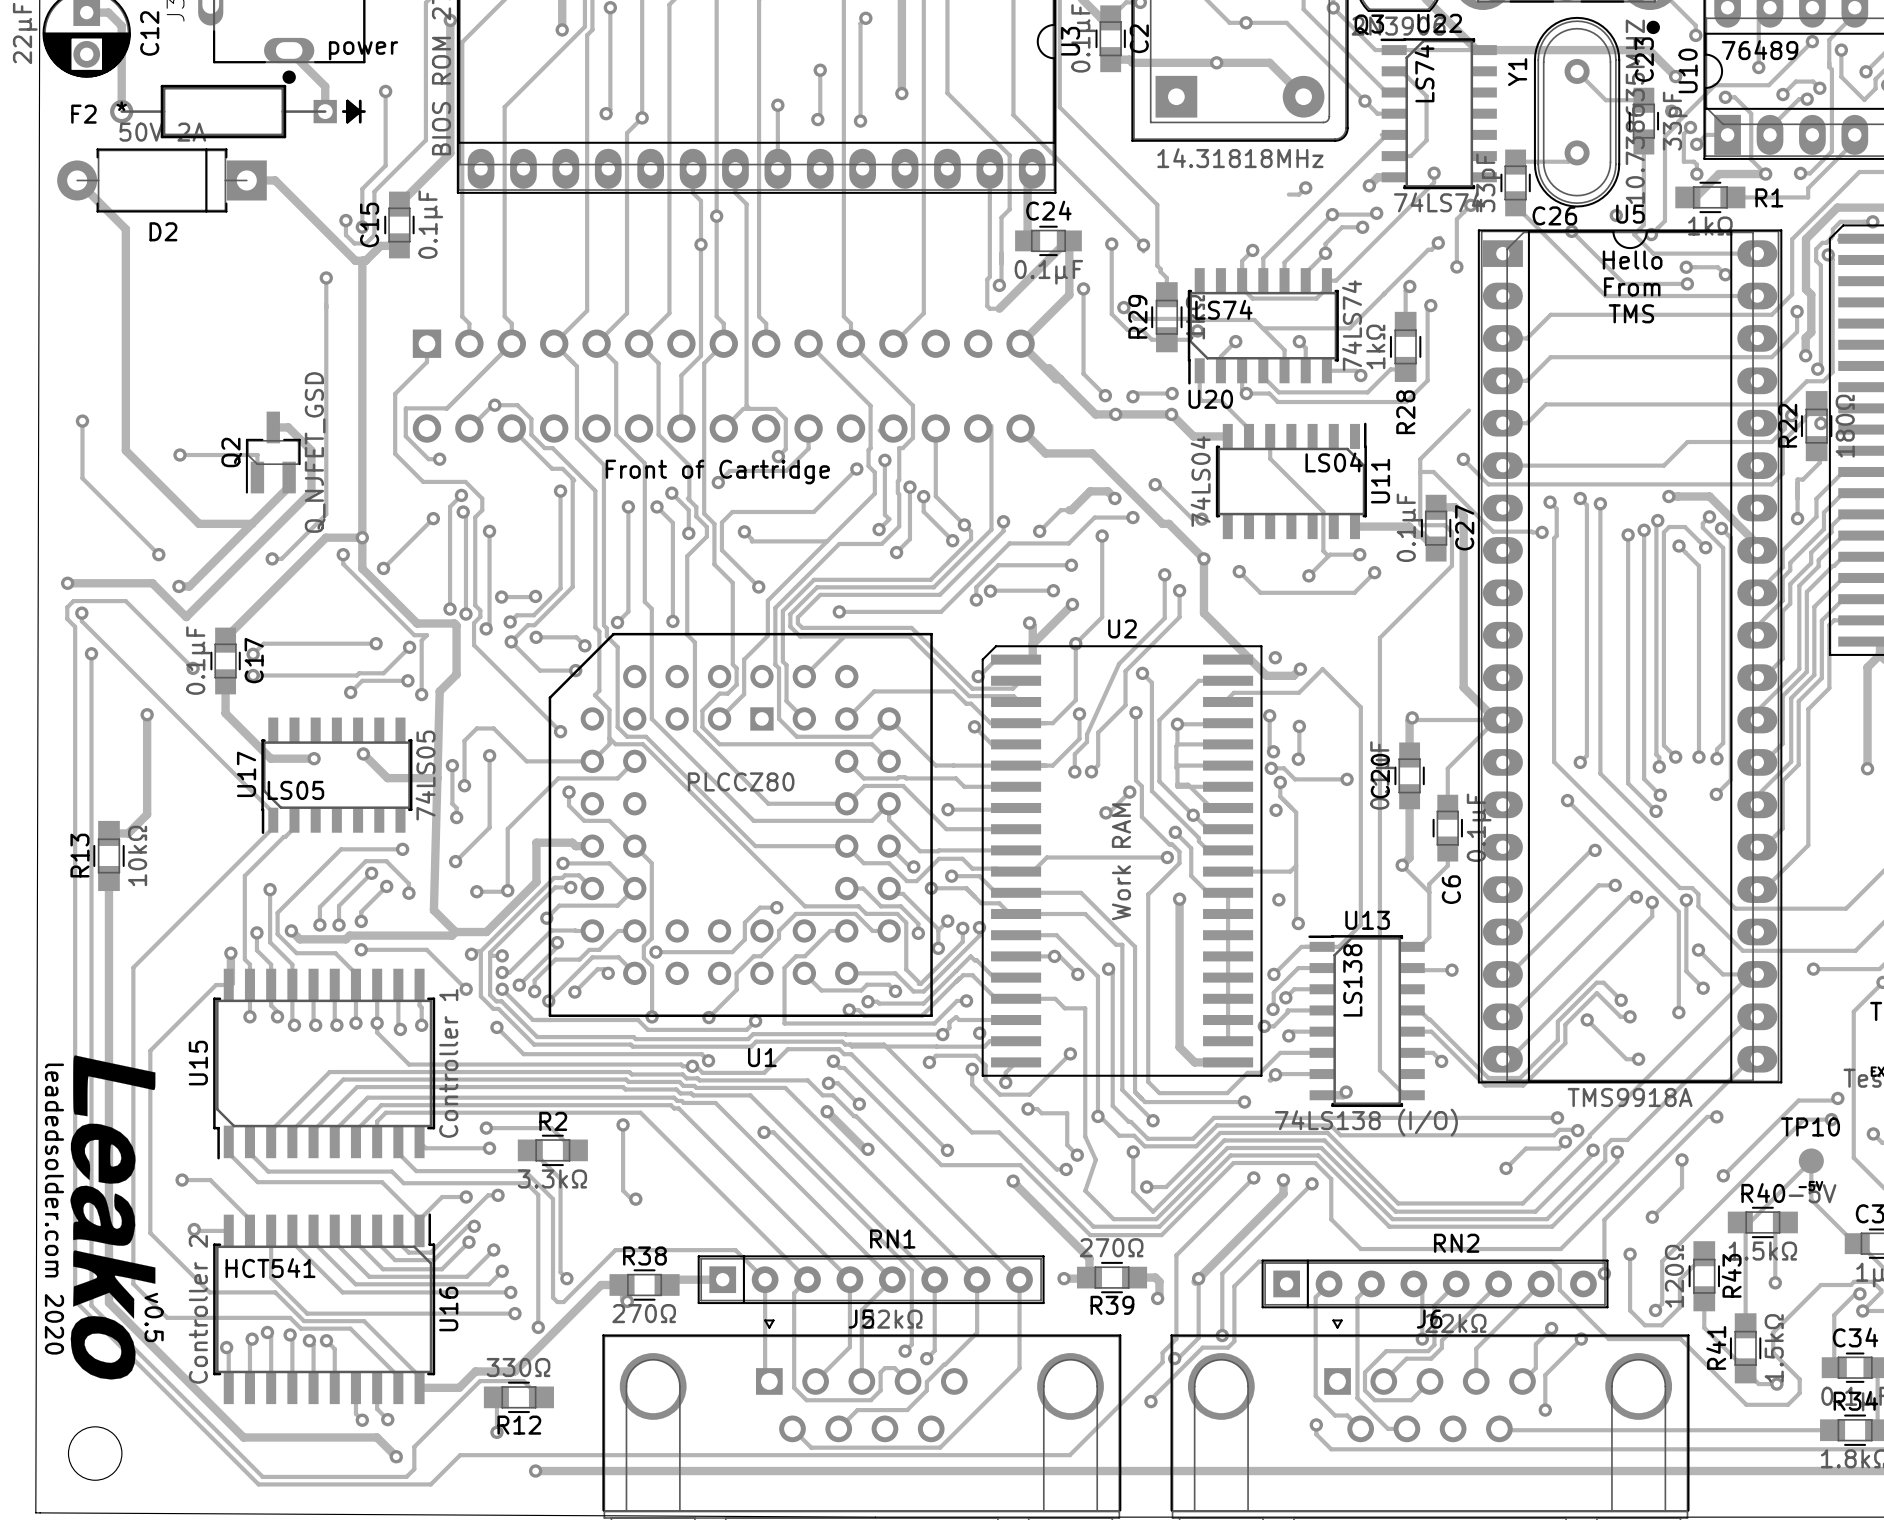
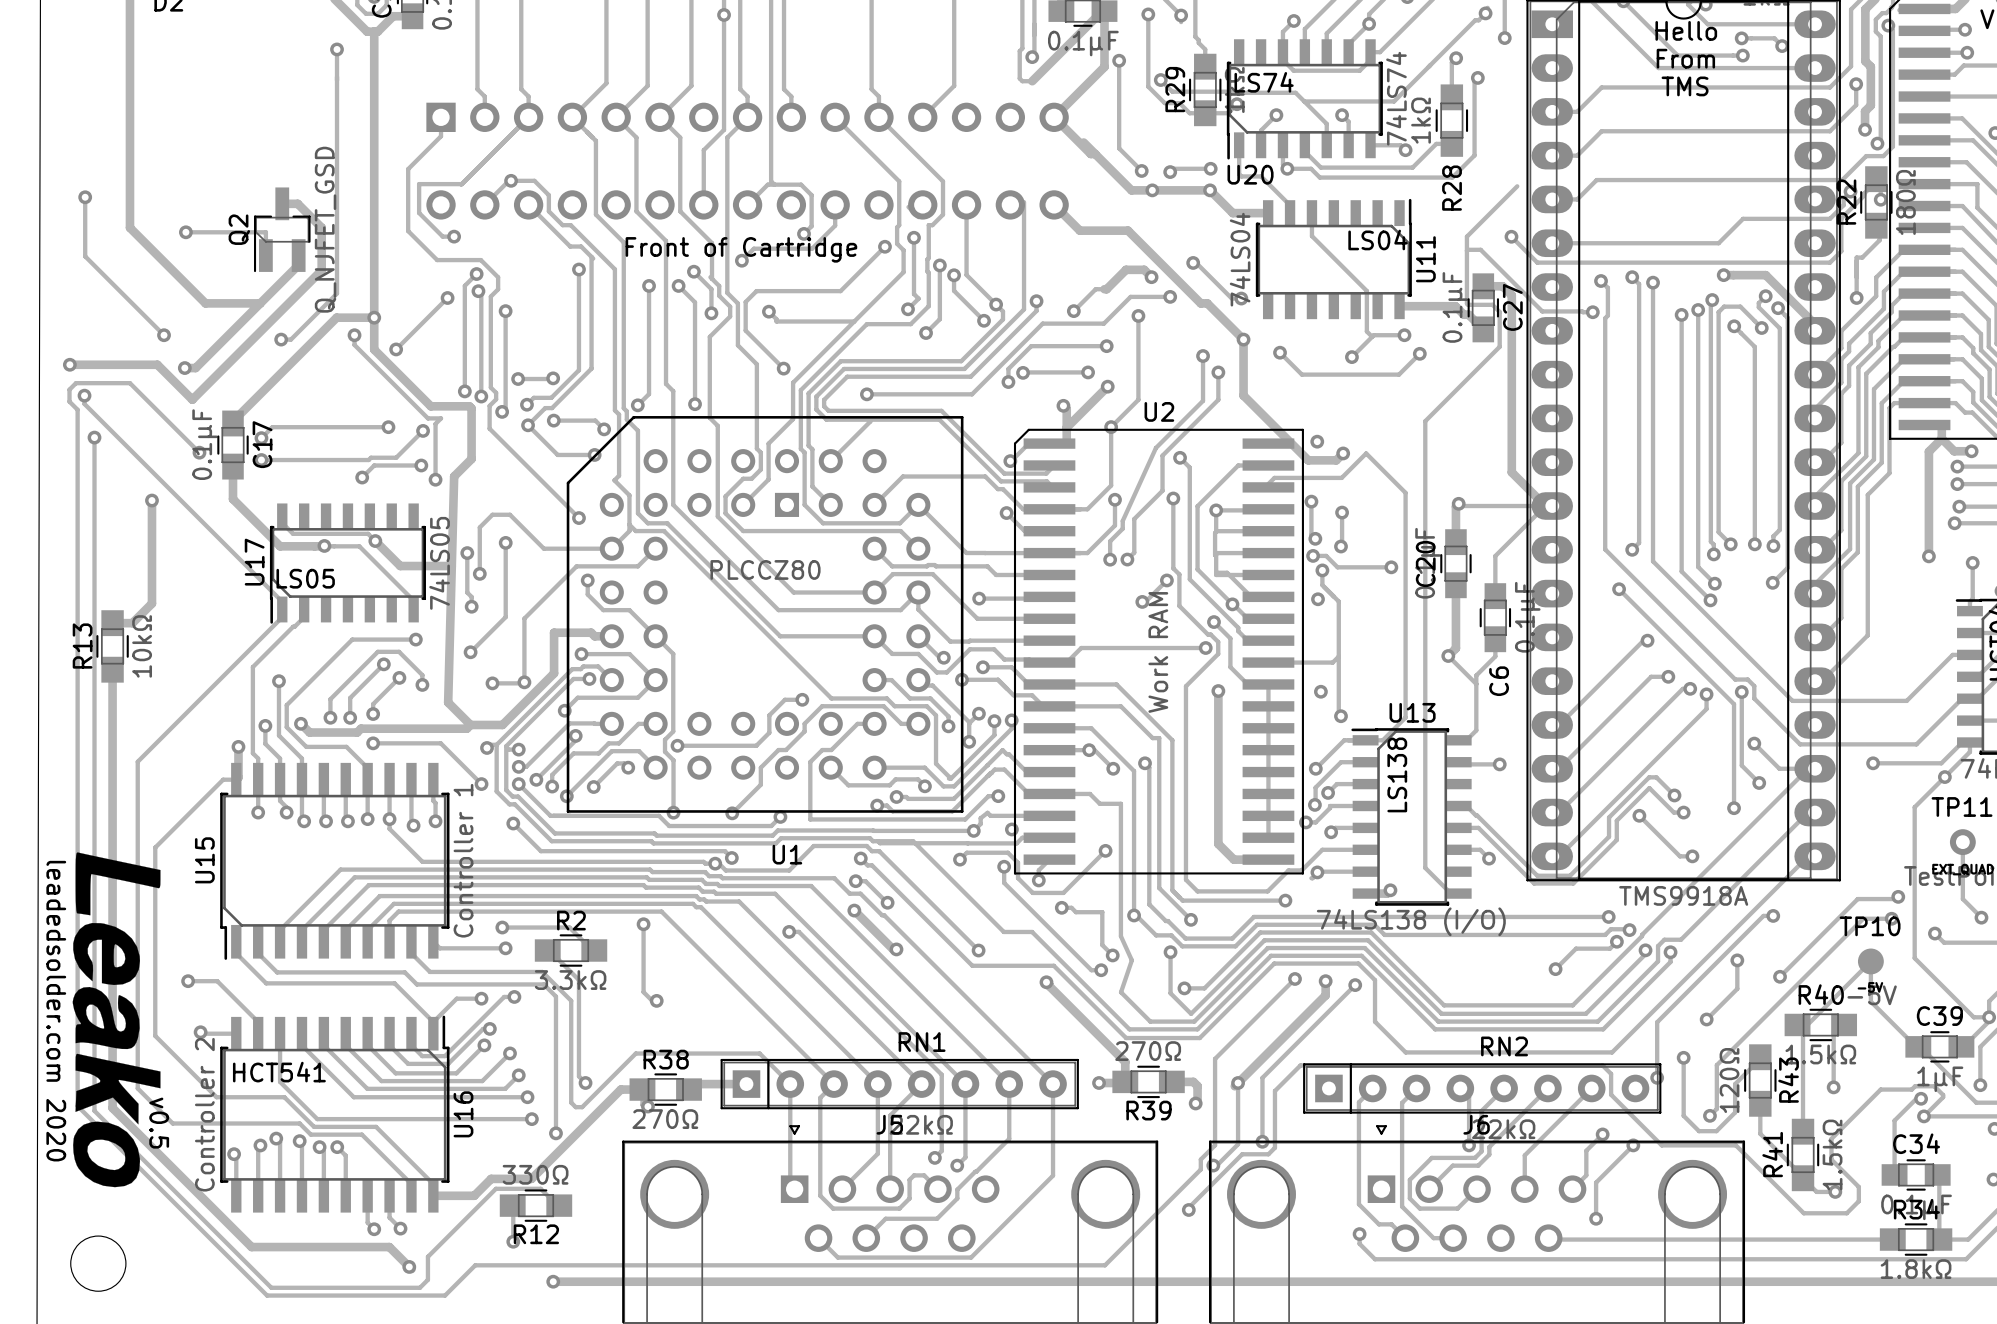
track: none -> (282, 515) (282, 523) (293, 533) (368, 533) (375, 541)
track: (270, 758) (314, 758) -> (279, 545) (359, 546) (413, 600) (413, 608)

